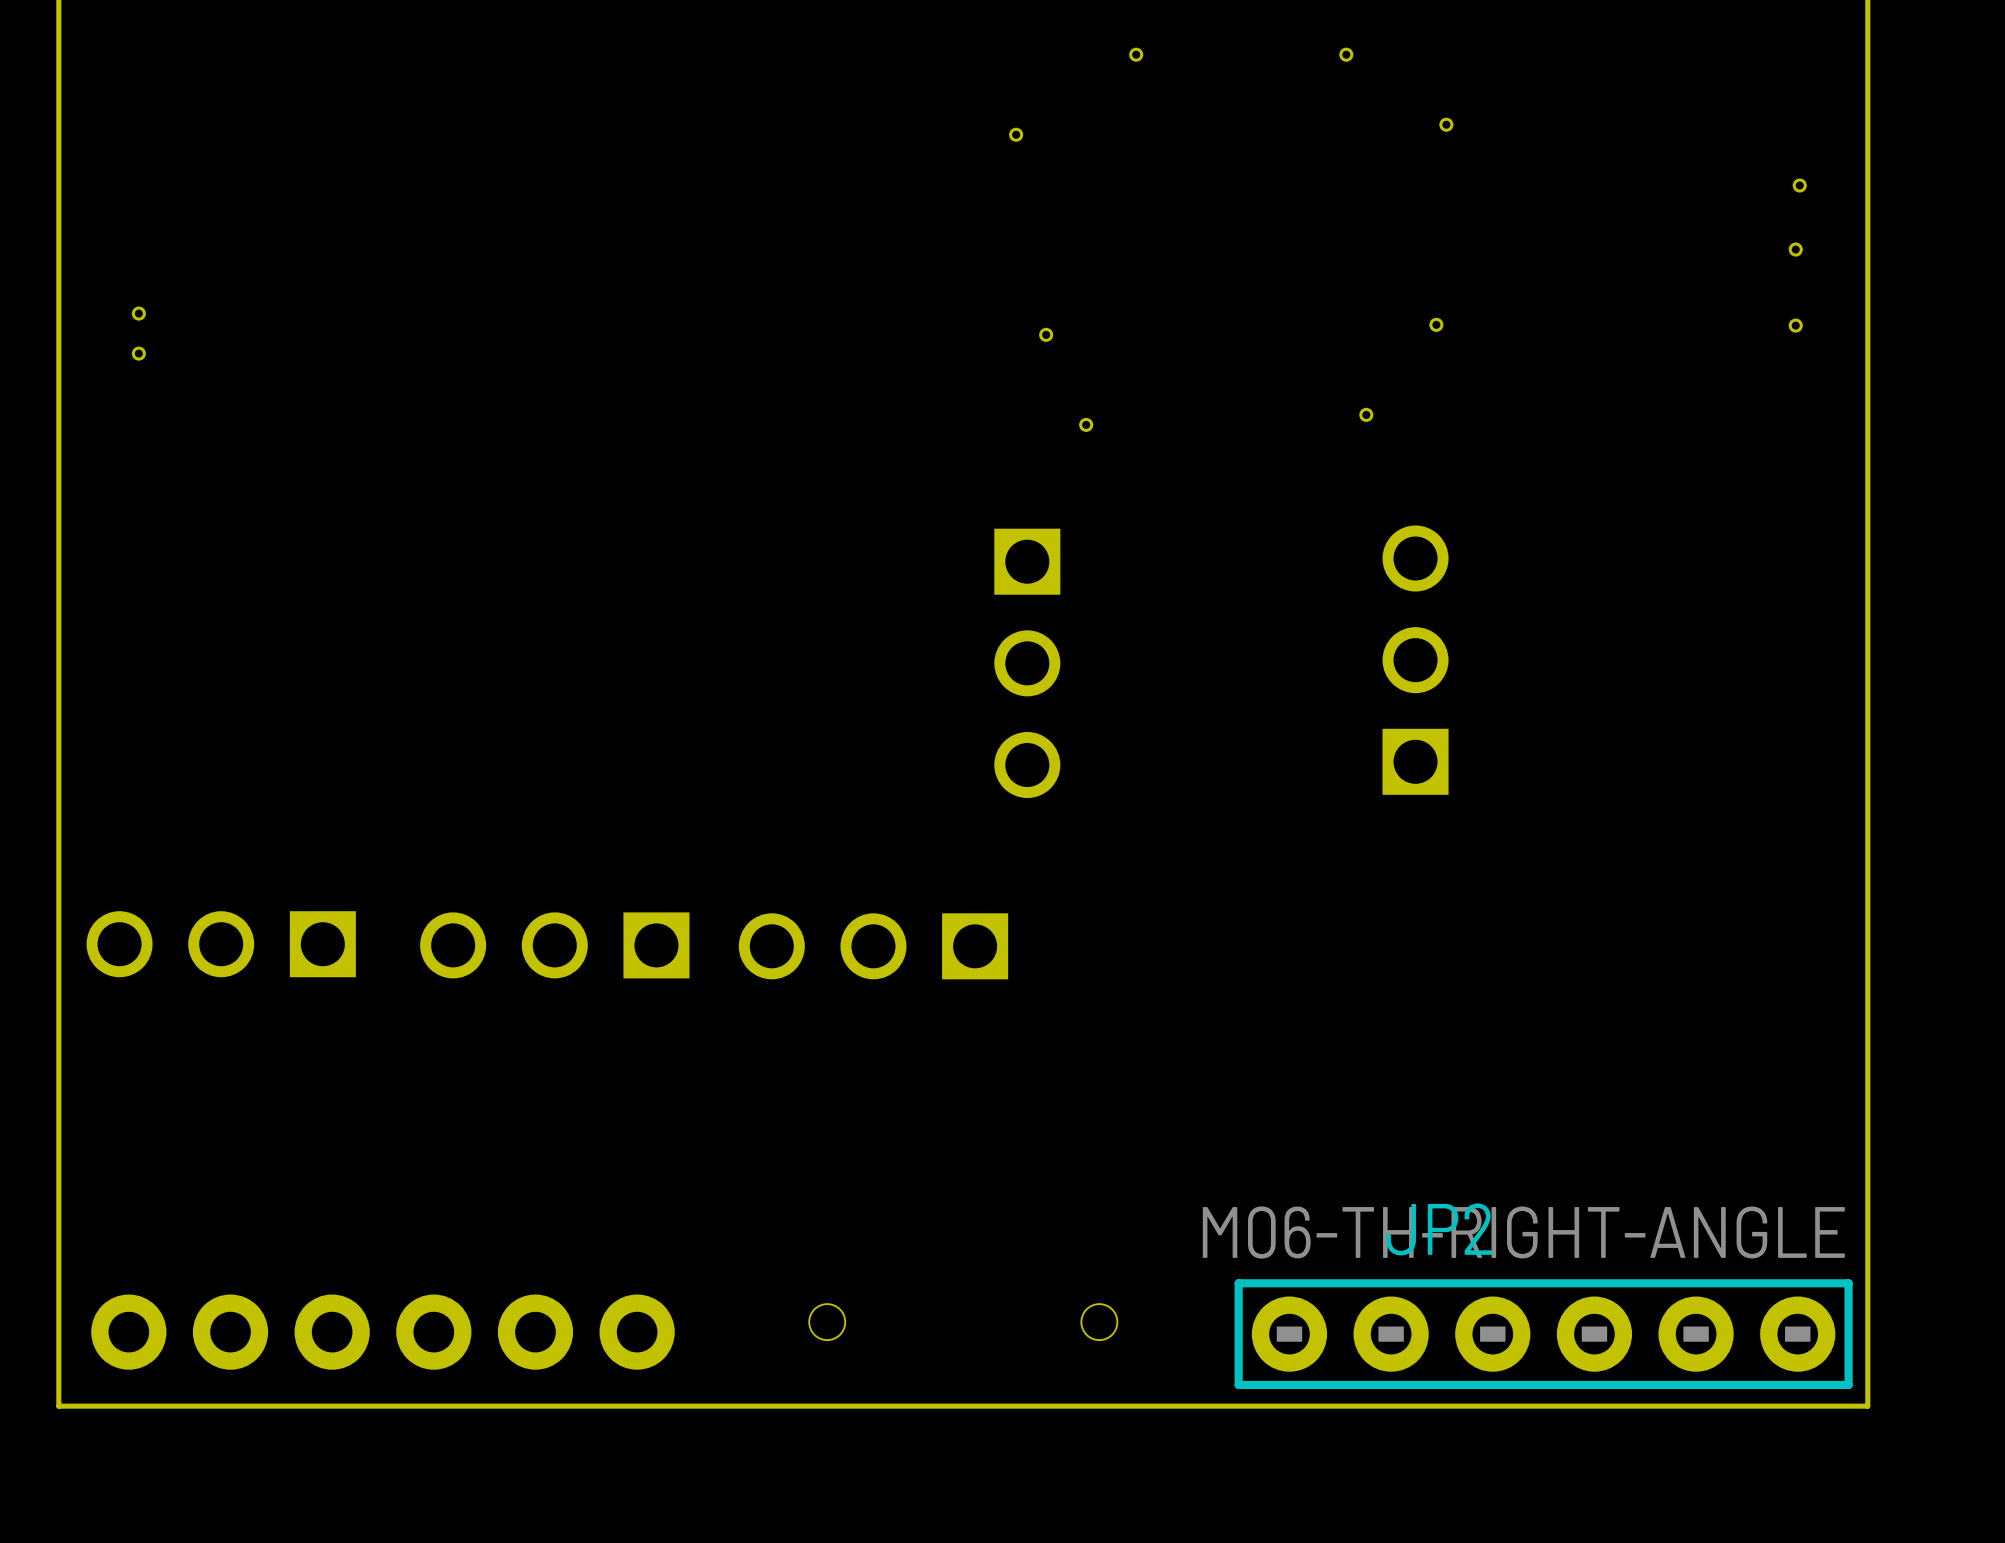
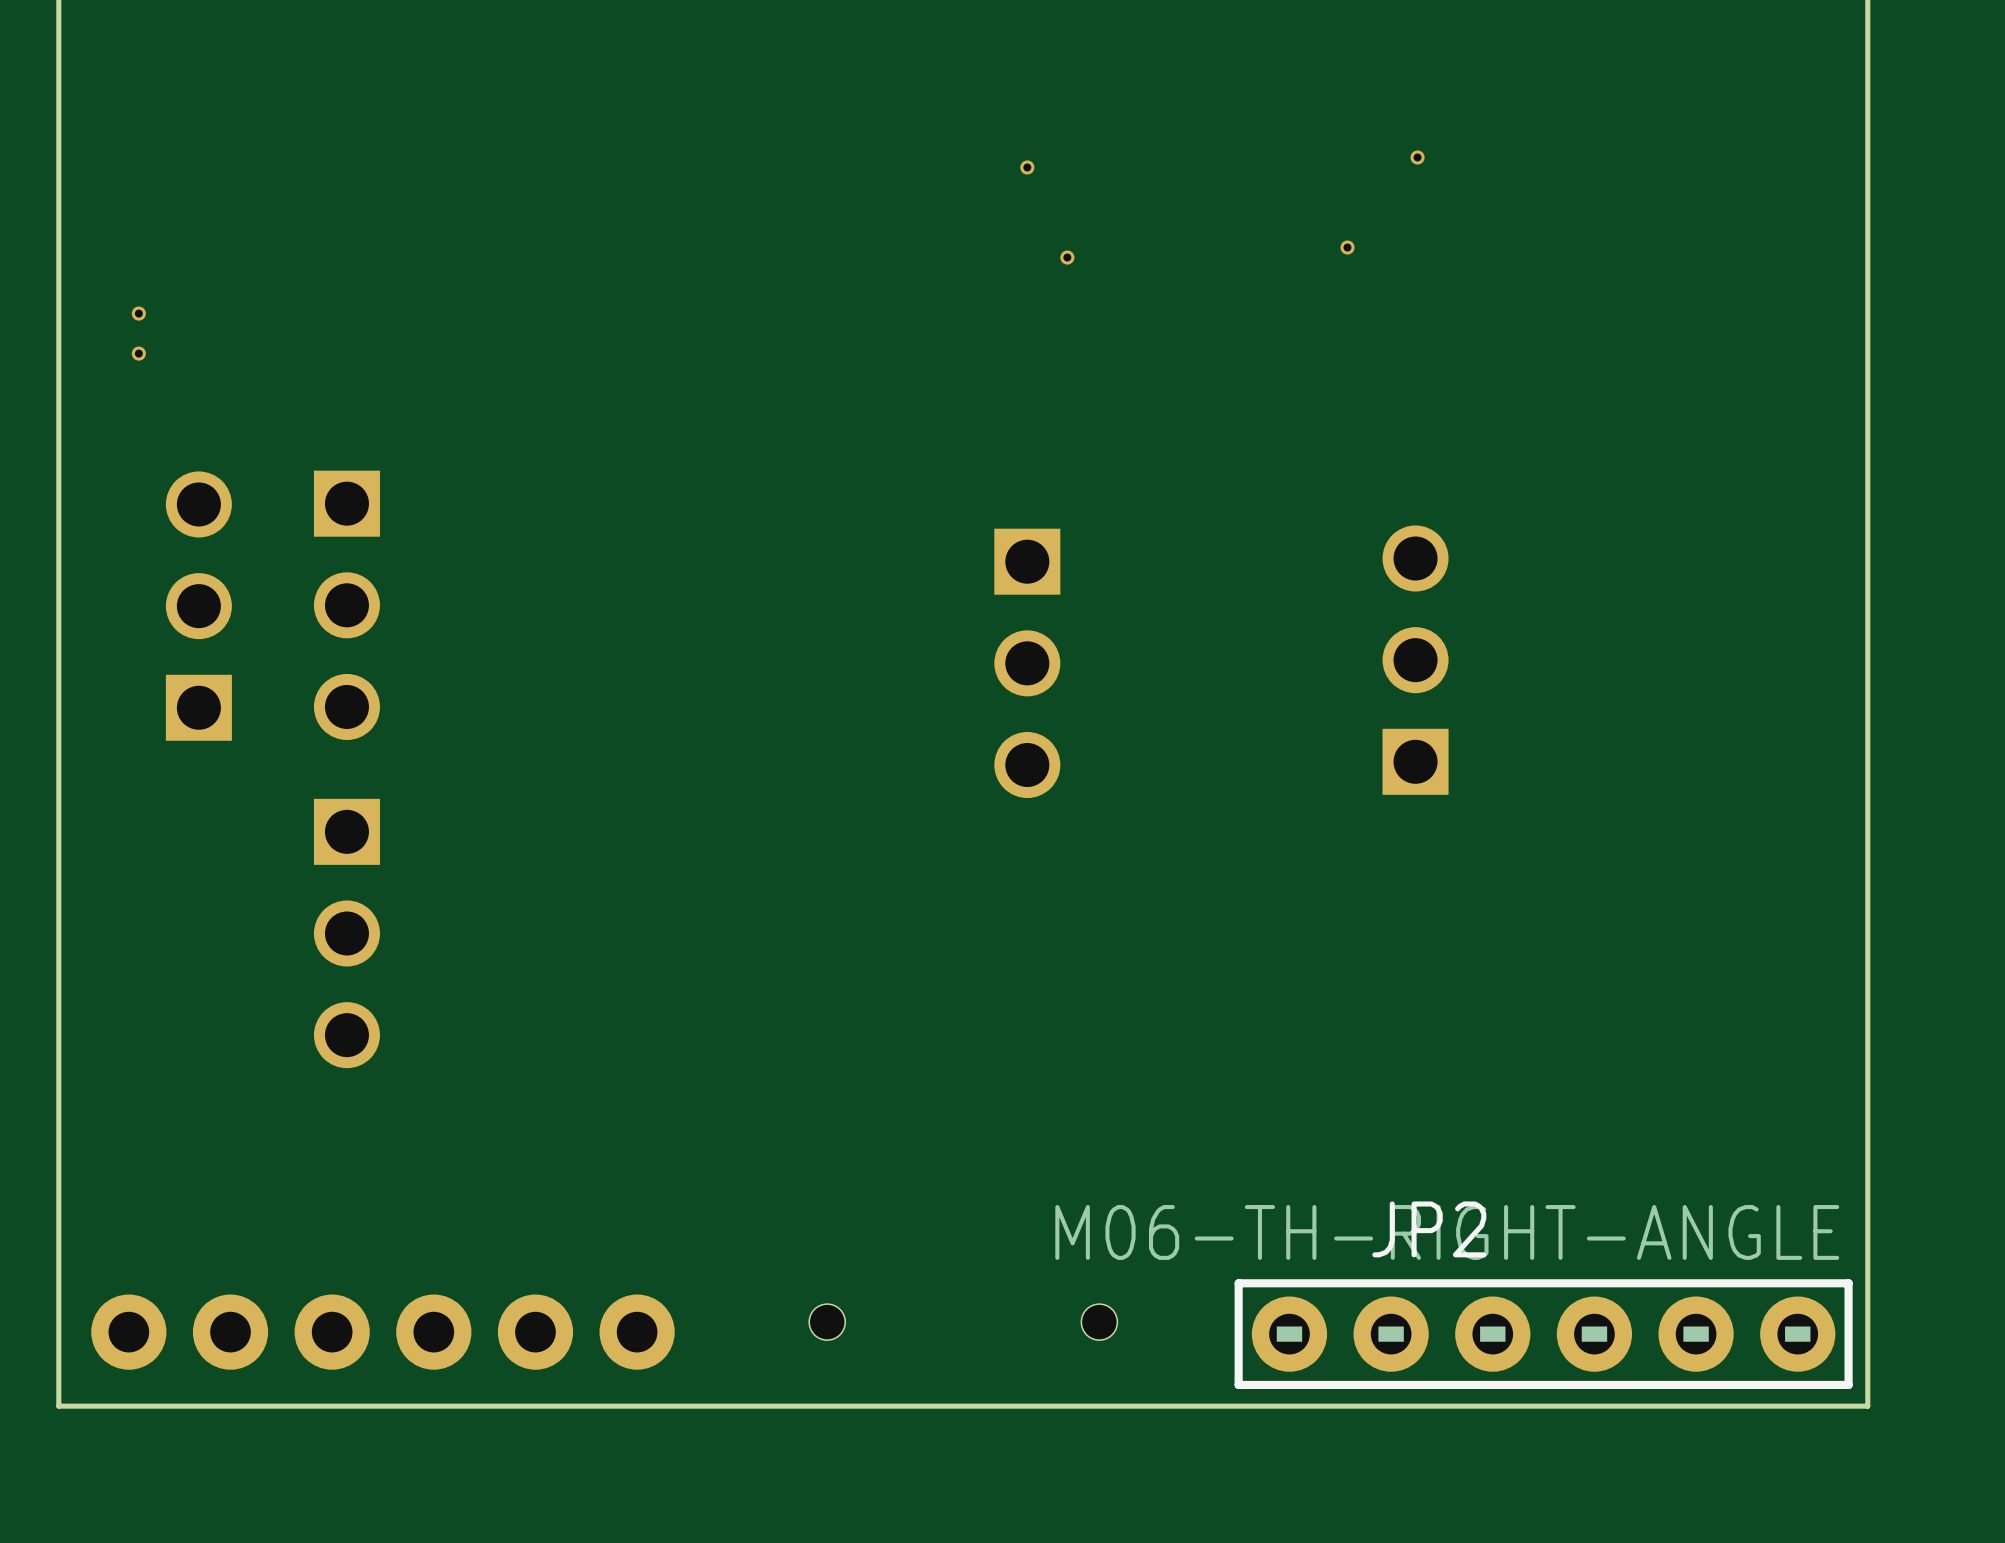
part: (1136, 54) -> none
part: (1346, 54) -> none
part position: (1446, 124) -> (1417, 157)
part position: (1016, 134) -> (1027, 167)
part: (1799, 185) -> none
part: none -> (1347, 247)
part: (1795, 249) -> none
part: (1436, 324) -> none
part: (1795, 325) -> none
part position: (1046, 334) -> (1067, 257)
part: (1366, 414) -> none
part: (1086, 424) -> none
part: none -> (346, 605)
part: none -> (198, 606)
part: none -> (346, 933)
part: (221, 944) -> none
part: (554, 945) -> none
part: (873, 946) -> none

